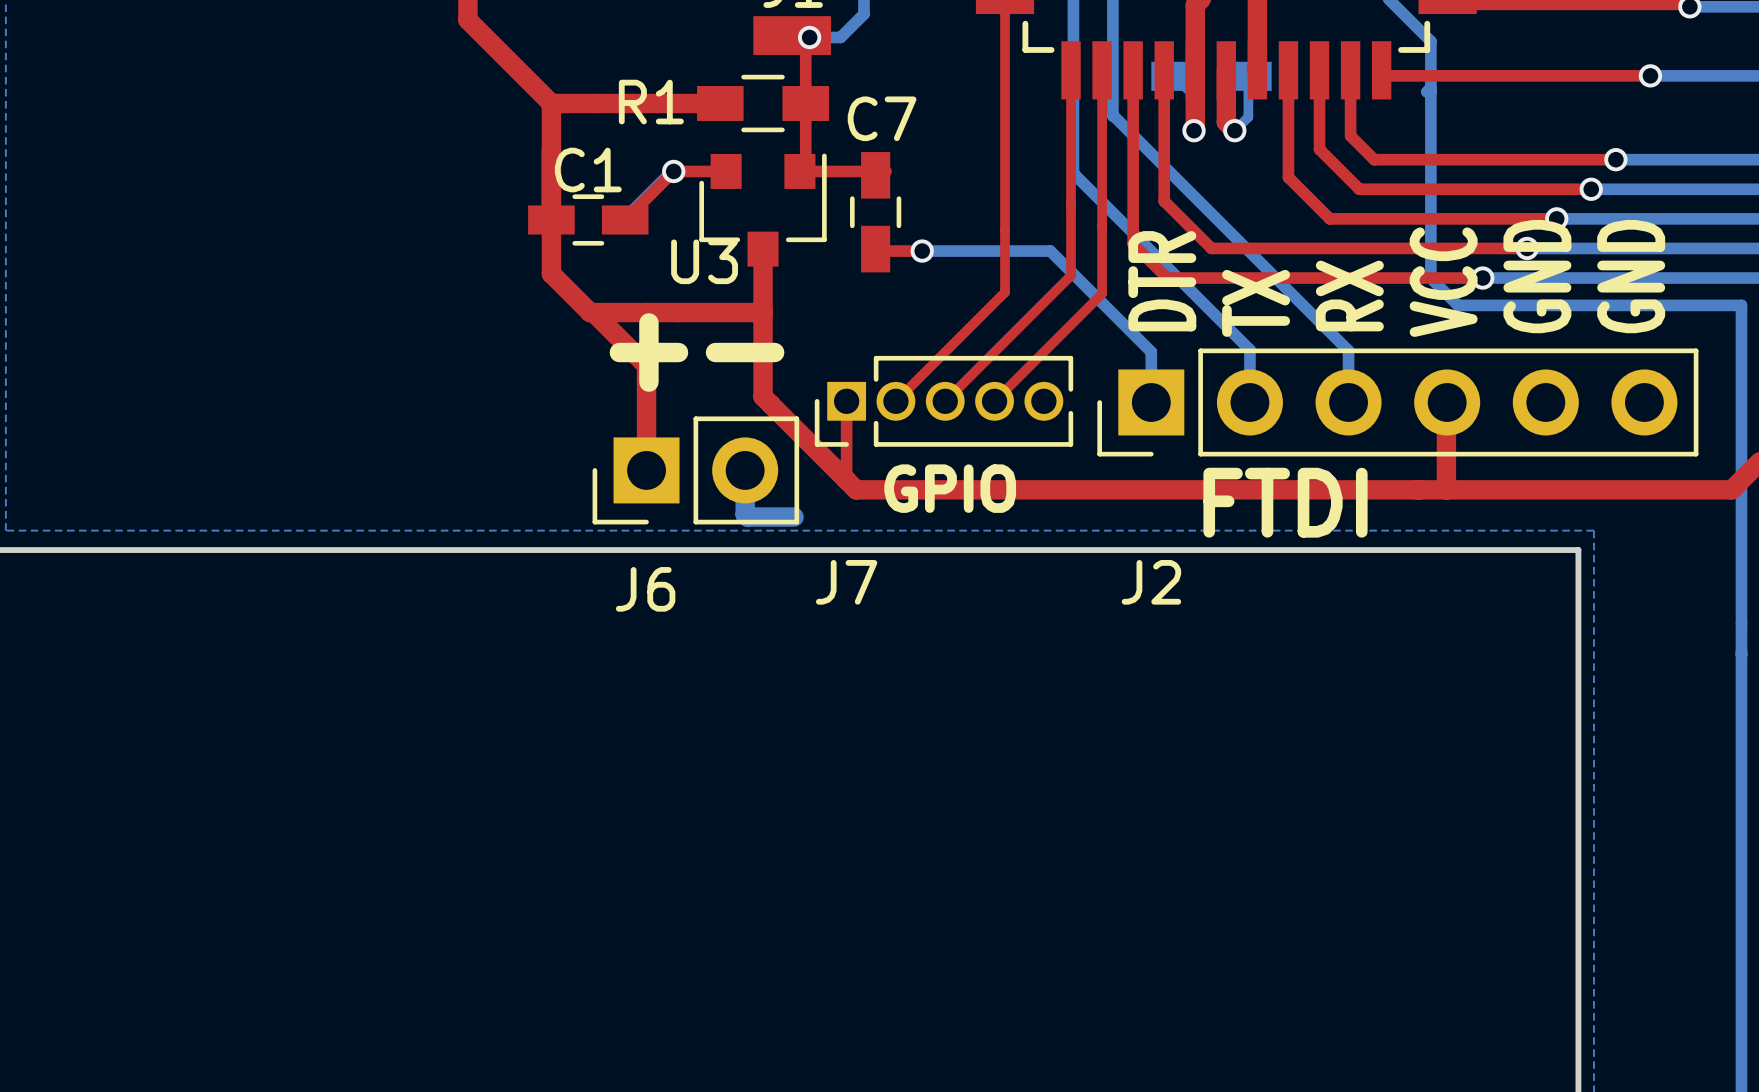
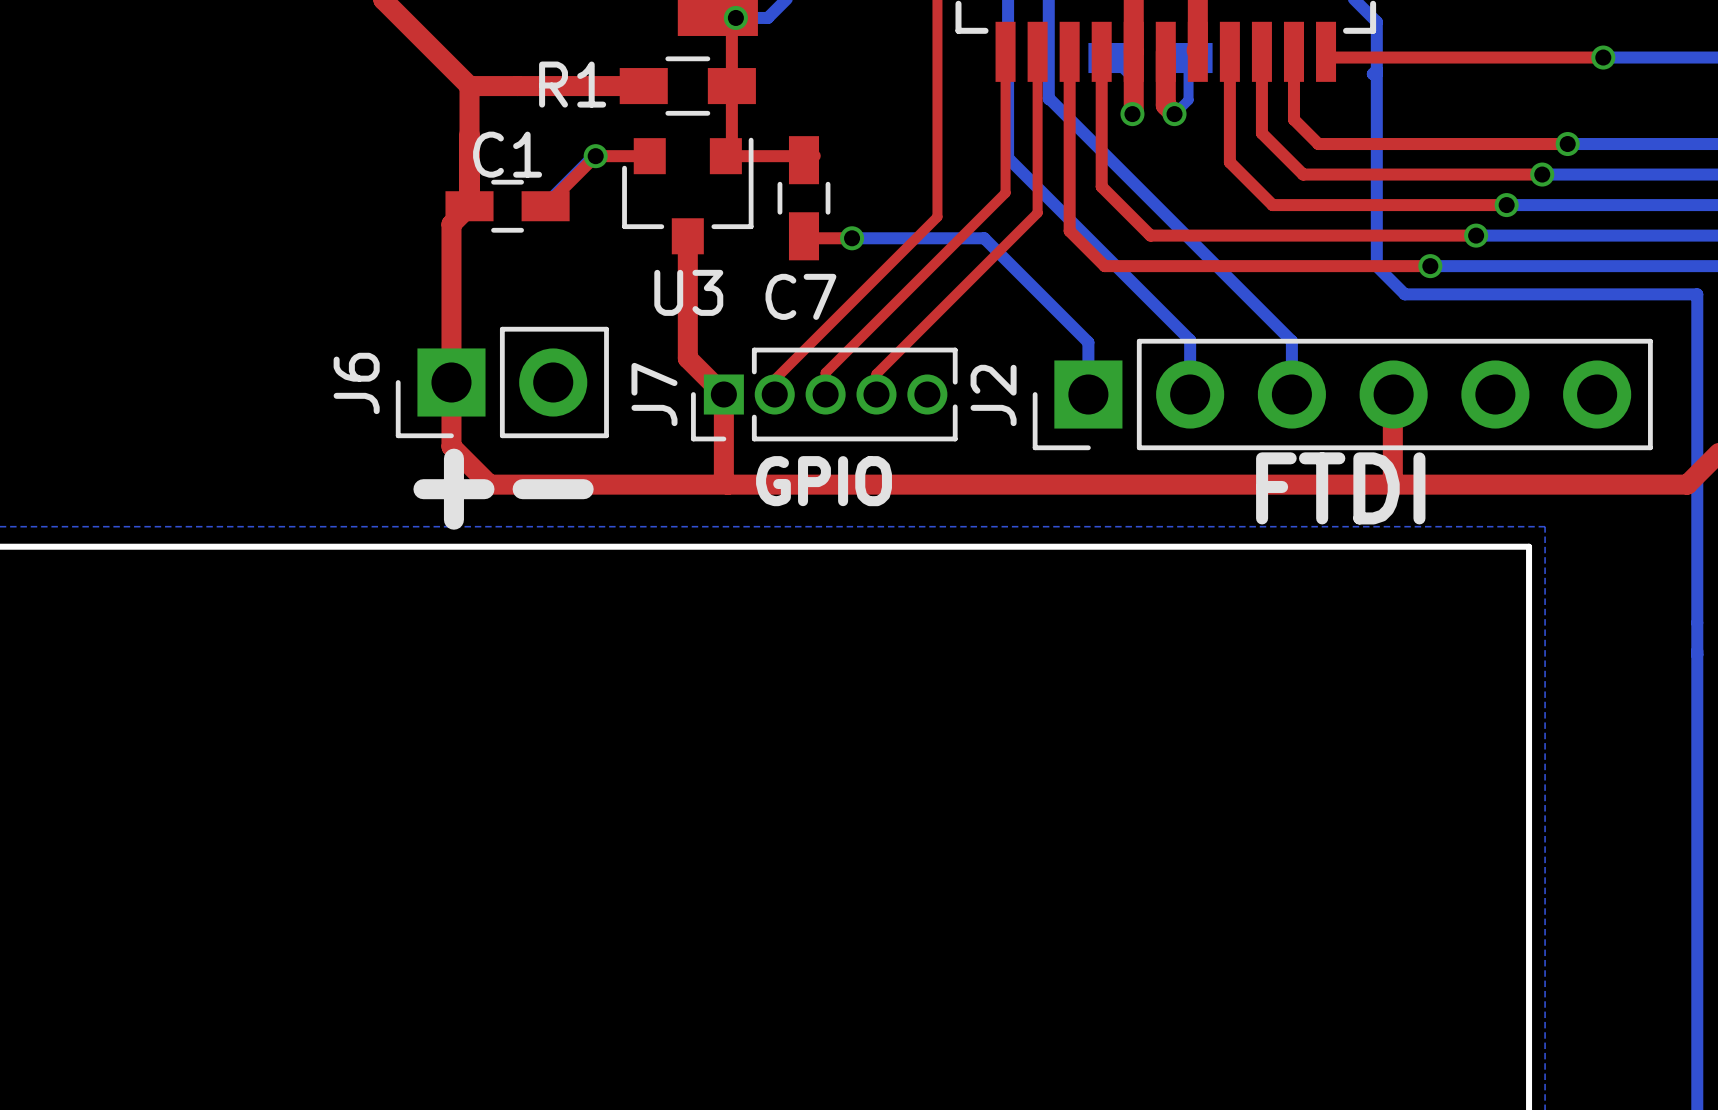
C7 name position: C7 (882, 118) -> C7 (800, 296)
top track: (1071, 207) (1071, 275) (945, 401) -> (1037, 212) (876, 374) (876, 394)
top track: none -> (1005, 192) (825, 372) (825, 394)
top track: (551, 219) (551, 273) (590, 312) (763, 312) -> (469, 206) (451, 224) (451, 446) (489, 484) (783, 484)
top track: (1102, 226) (1102, 293) (994, 401) -> none
top track: (1005, 230) (1005, 292) (895, 401) -> (937, 216) (774, 379) (774, 394)
U3 name position: U3 (704, 261) -> U3 (688, 292)
text: GND (1537, 276) -> none
text: GND (1631, 276) -> none
text: DTR (1162, 281) -> none
text: VCC (1443, 282) -> none
text: RX (1349, 296) -> none
text: TX (1256, 303) -> none
top track: (593, 312) (646, 365) (646, 462) -> none
text position: +- (697, 352) -> +- (503, 489)
top track: (763, 367) (763, 396) (856, 489) -> (687, 358) (723, 394) (723, 480) (727, 484)
top track: (846, 401) (846, 480) -> none
J7 position: (943, 401) -> (824, 394)
J6 position: (695, 470) -> (502, 382)
bottom track: (745, 470) (745, 514) (747, 517) (794, 517) -> none
text position: GPIO (950, 488) -> GPIO (824, 481)
text position: FTDI (1285, 502) -> FTDI (1340, 488)
J7 name rotation: 0° (846, 582) -> 90° counterclockwise (654, 394)
J7 name position: J7 (846, 582) -> J7 (654, 394)
J2 name rotation: 0° (1151, 582) -> 90° counterclockwise (993, 395)
J2 name position: J2 (1151, 582) -> J2 (993, 395)
J6 name rotation: 0° (645, 589) -> 90° counterclockwise (356, 383)
J6 name position: J6 (645, 589) -> J6 (356, 383)

